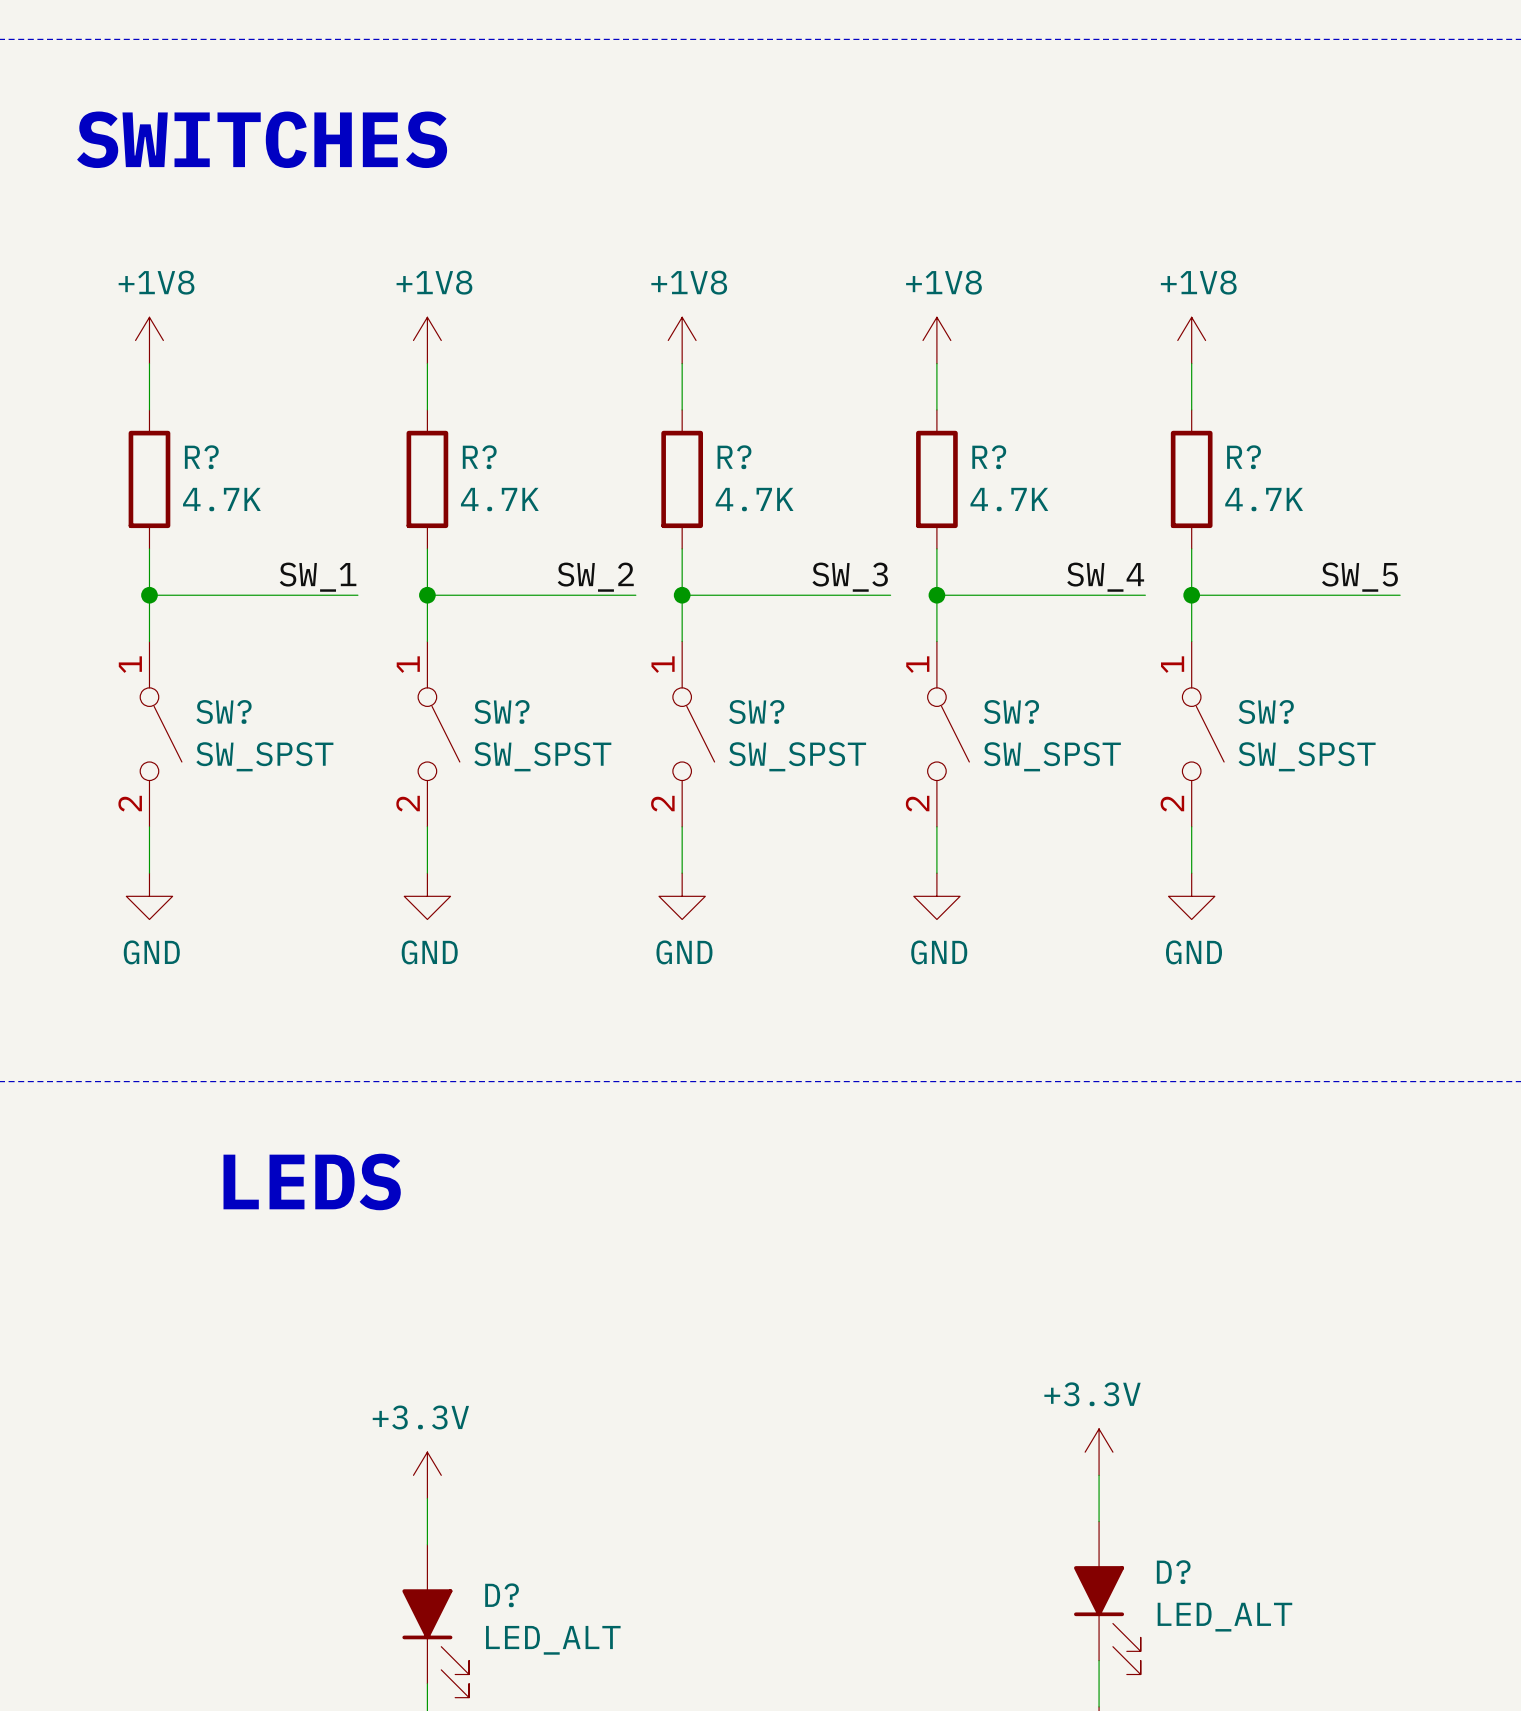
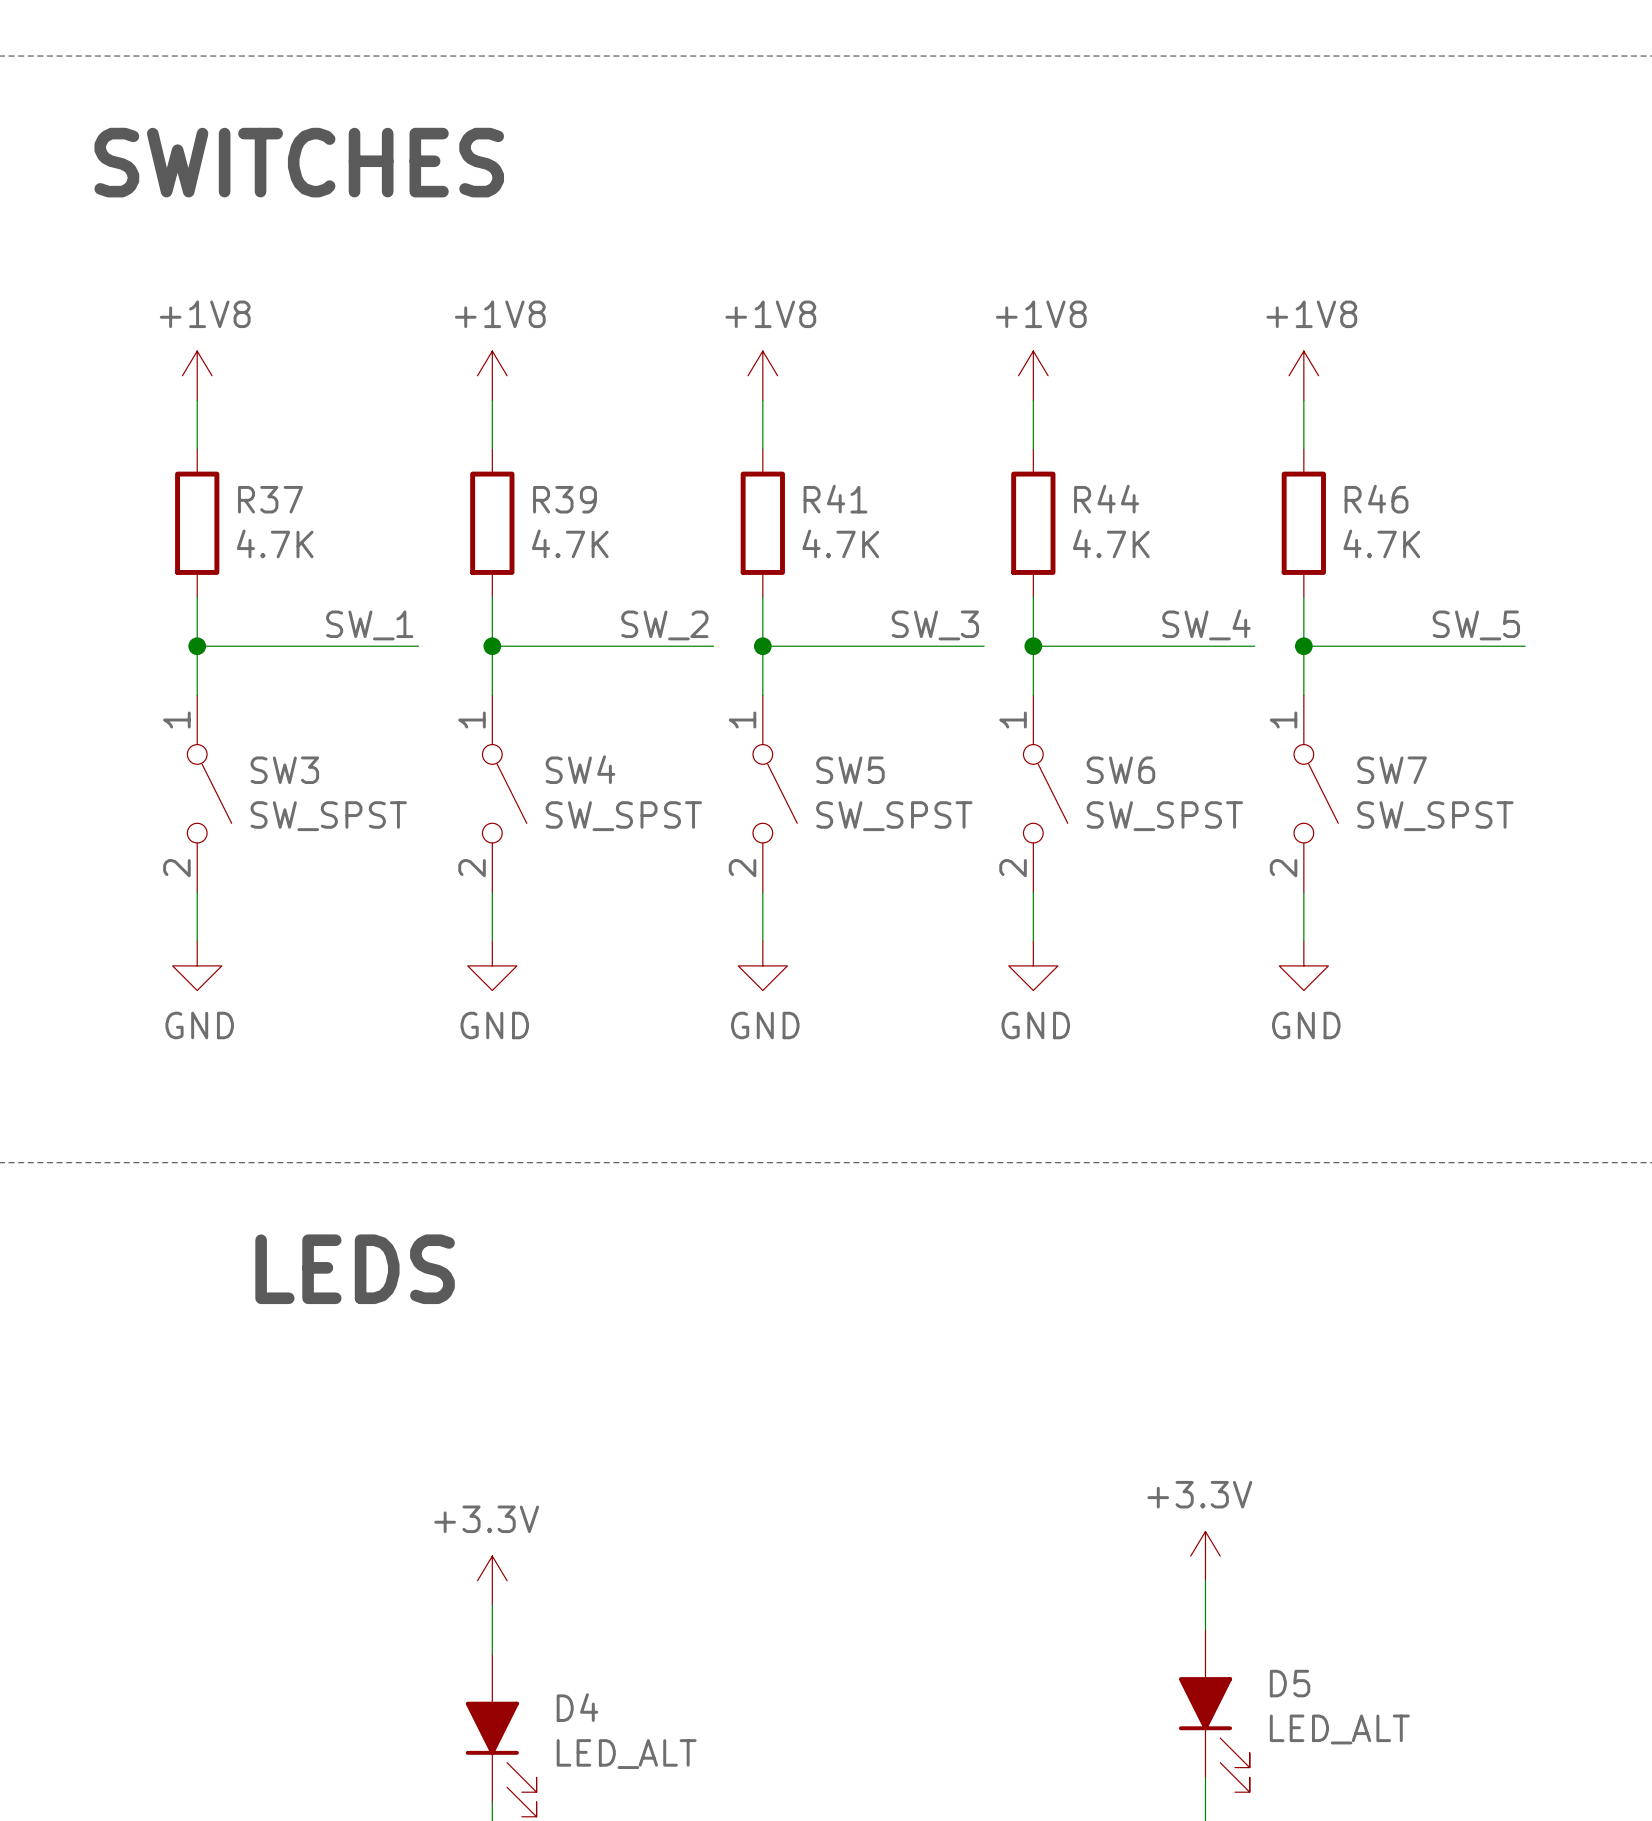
R? name: R? (201, 457) -> R37 (270, 499)
R? name: R? (479, 457) -> R39 (564, 499)
R? name: R? (734, 457) -> R41 (835, 499)
R? name: R? (989, 457) -> R44 (1106, 499)
R? name: R? (1244, 457) -> R46 (1376, 499)
SW? name: SW? (223, 712) -> SW3 (284, 770)
SW? name: SW? (501, 712) -> SW4 (580, 769)
SW? name: SW? (756, 712) -> SW5 (850, 770)
SW? name: SW? (1011, 712) -> SW6 (1120, 770)
SW? name: SW? (1266, 712) -> SW7 (1392, 770)
D? name: D? (1173, 1572) -> D5 (1290, 1683)
D? name: D? (502, 1595) -> D4 (577, 1707)

